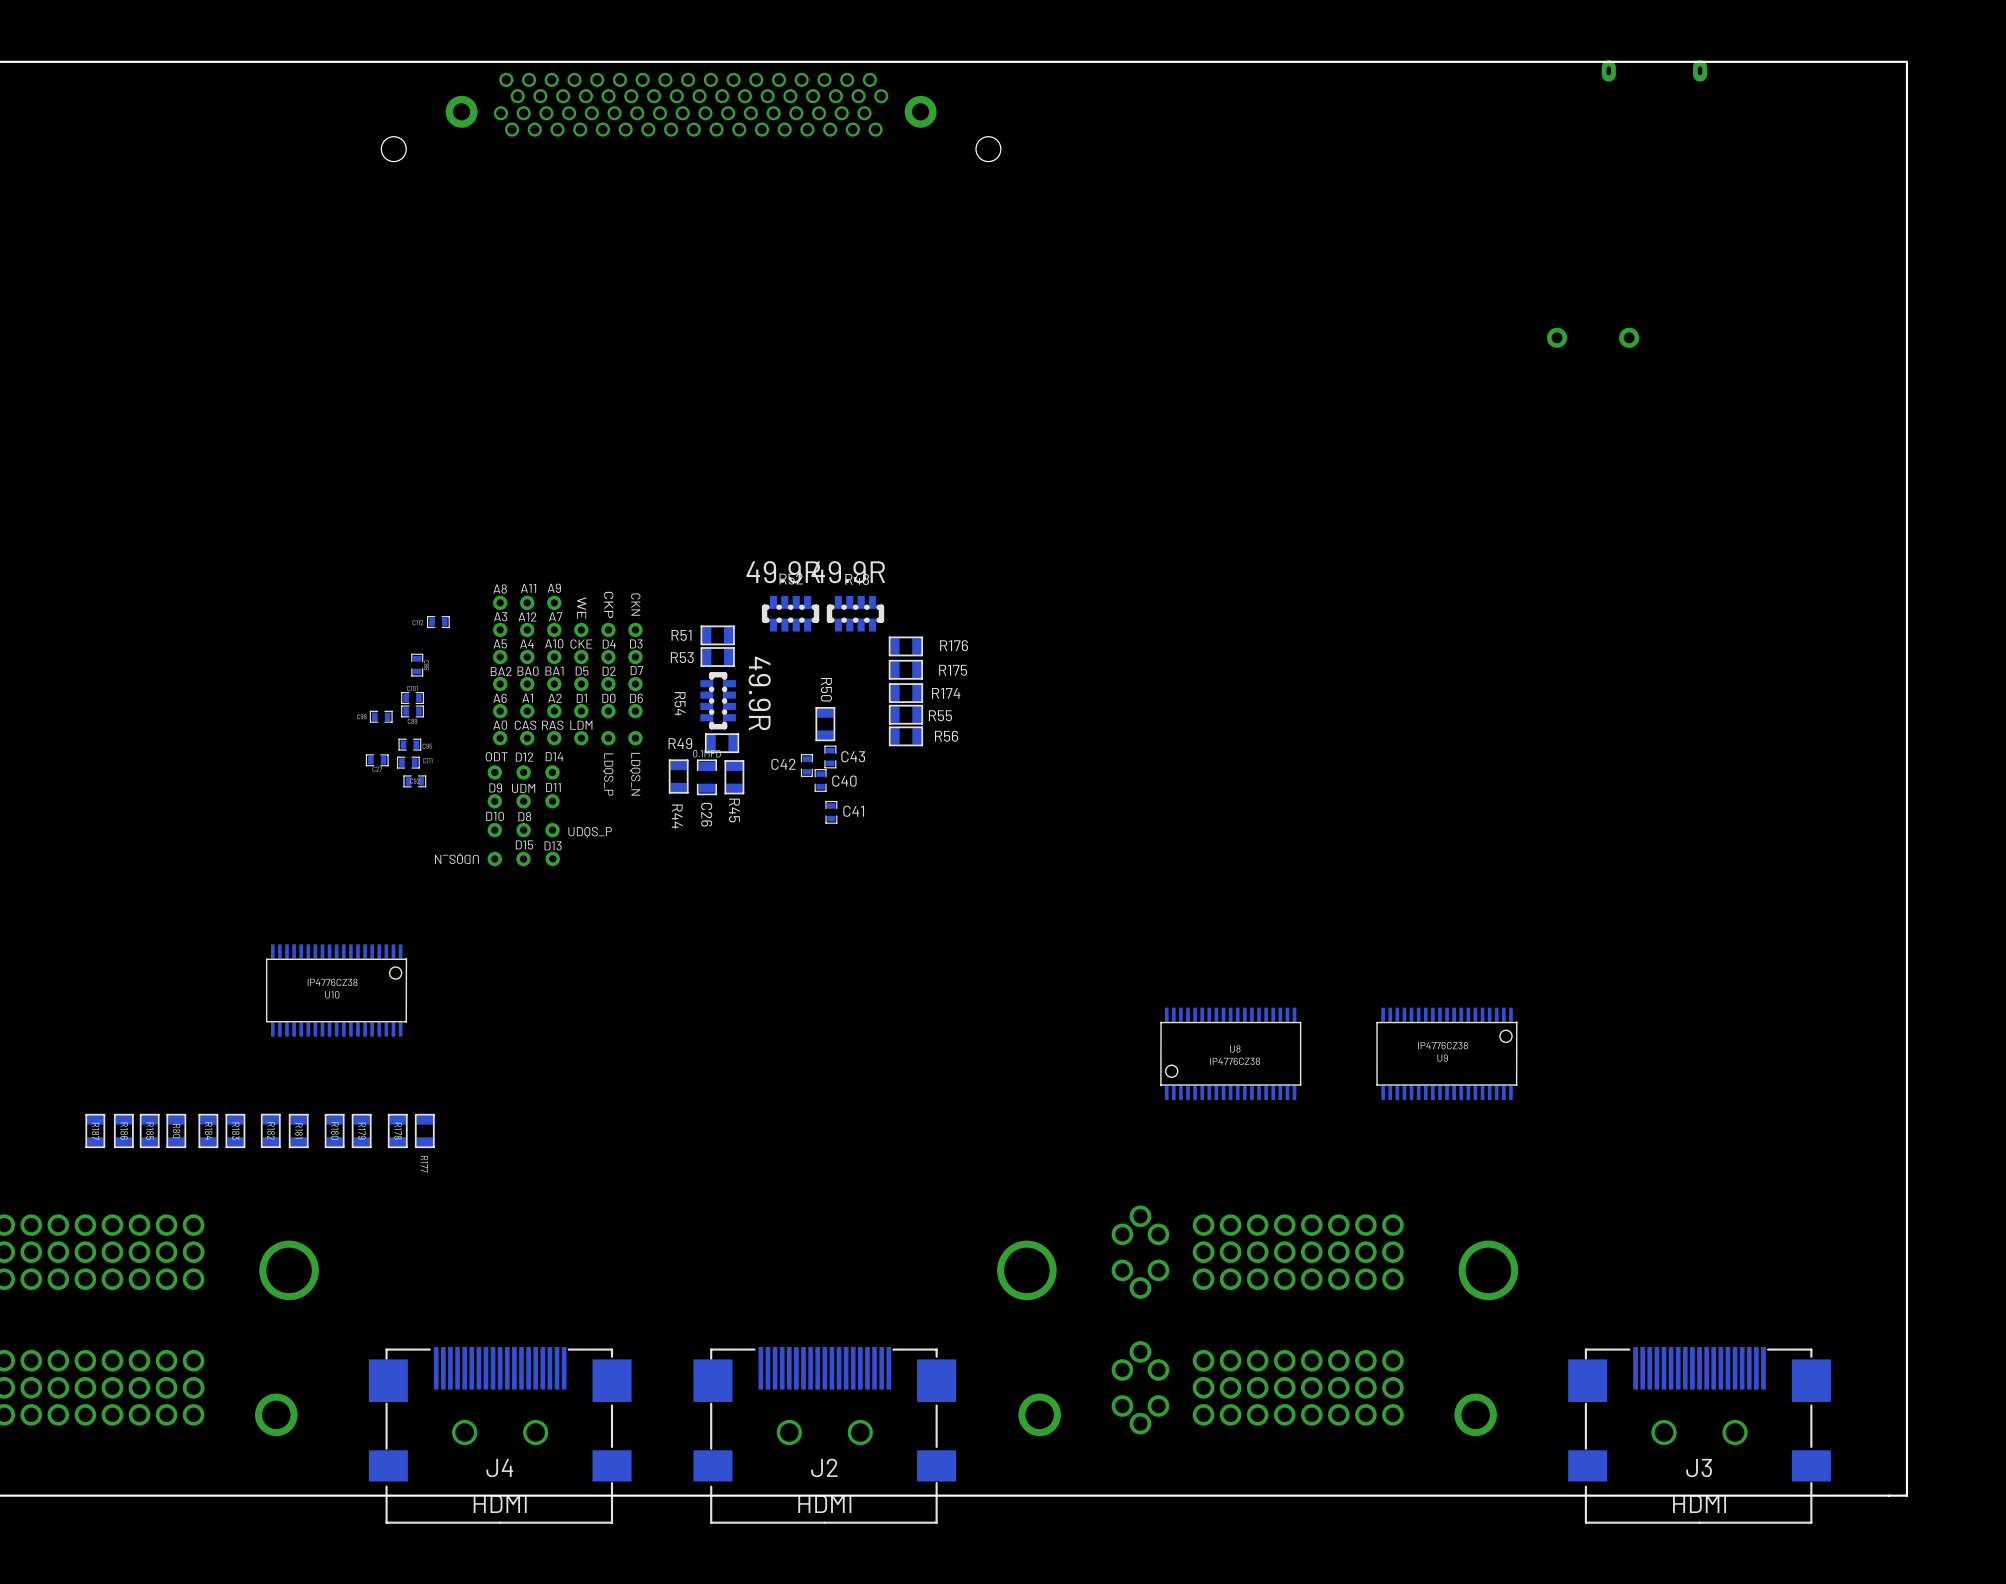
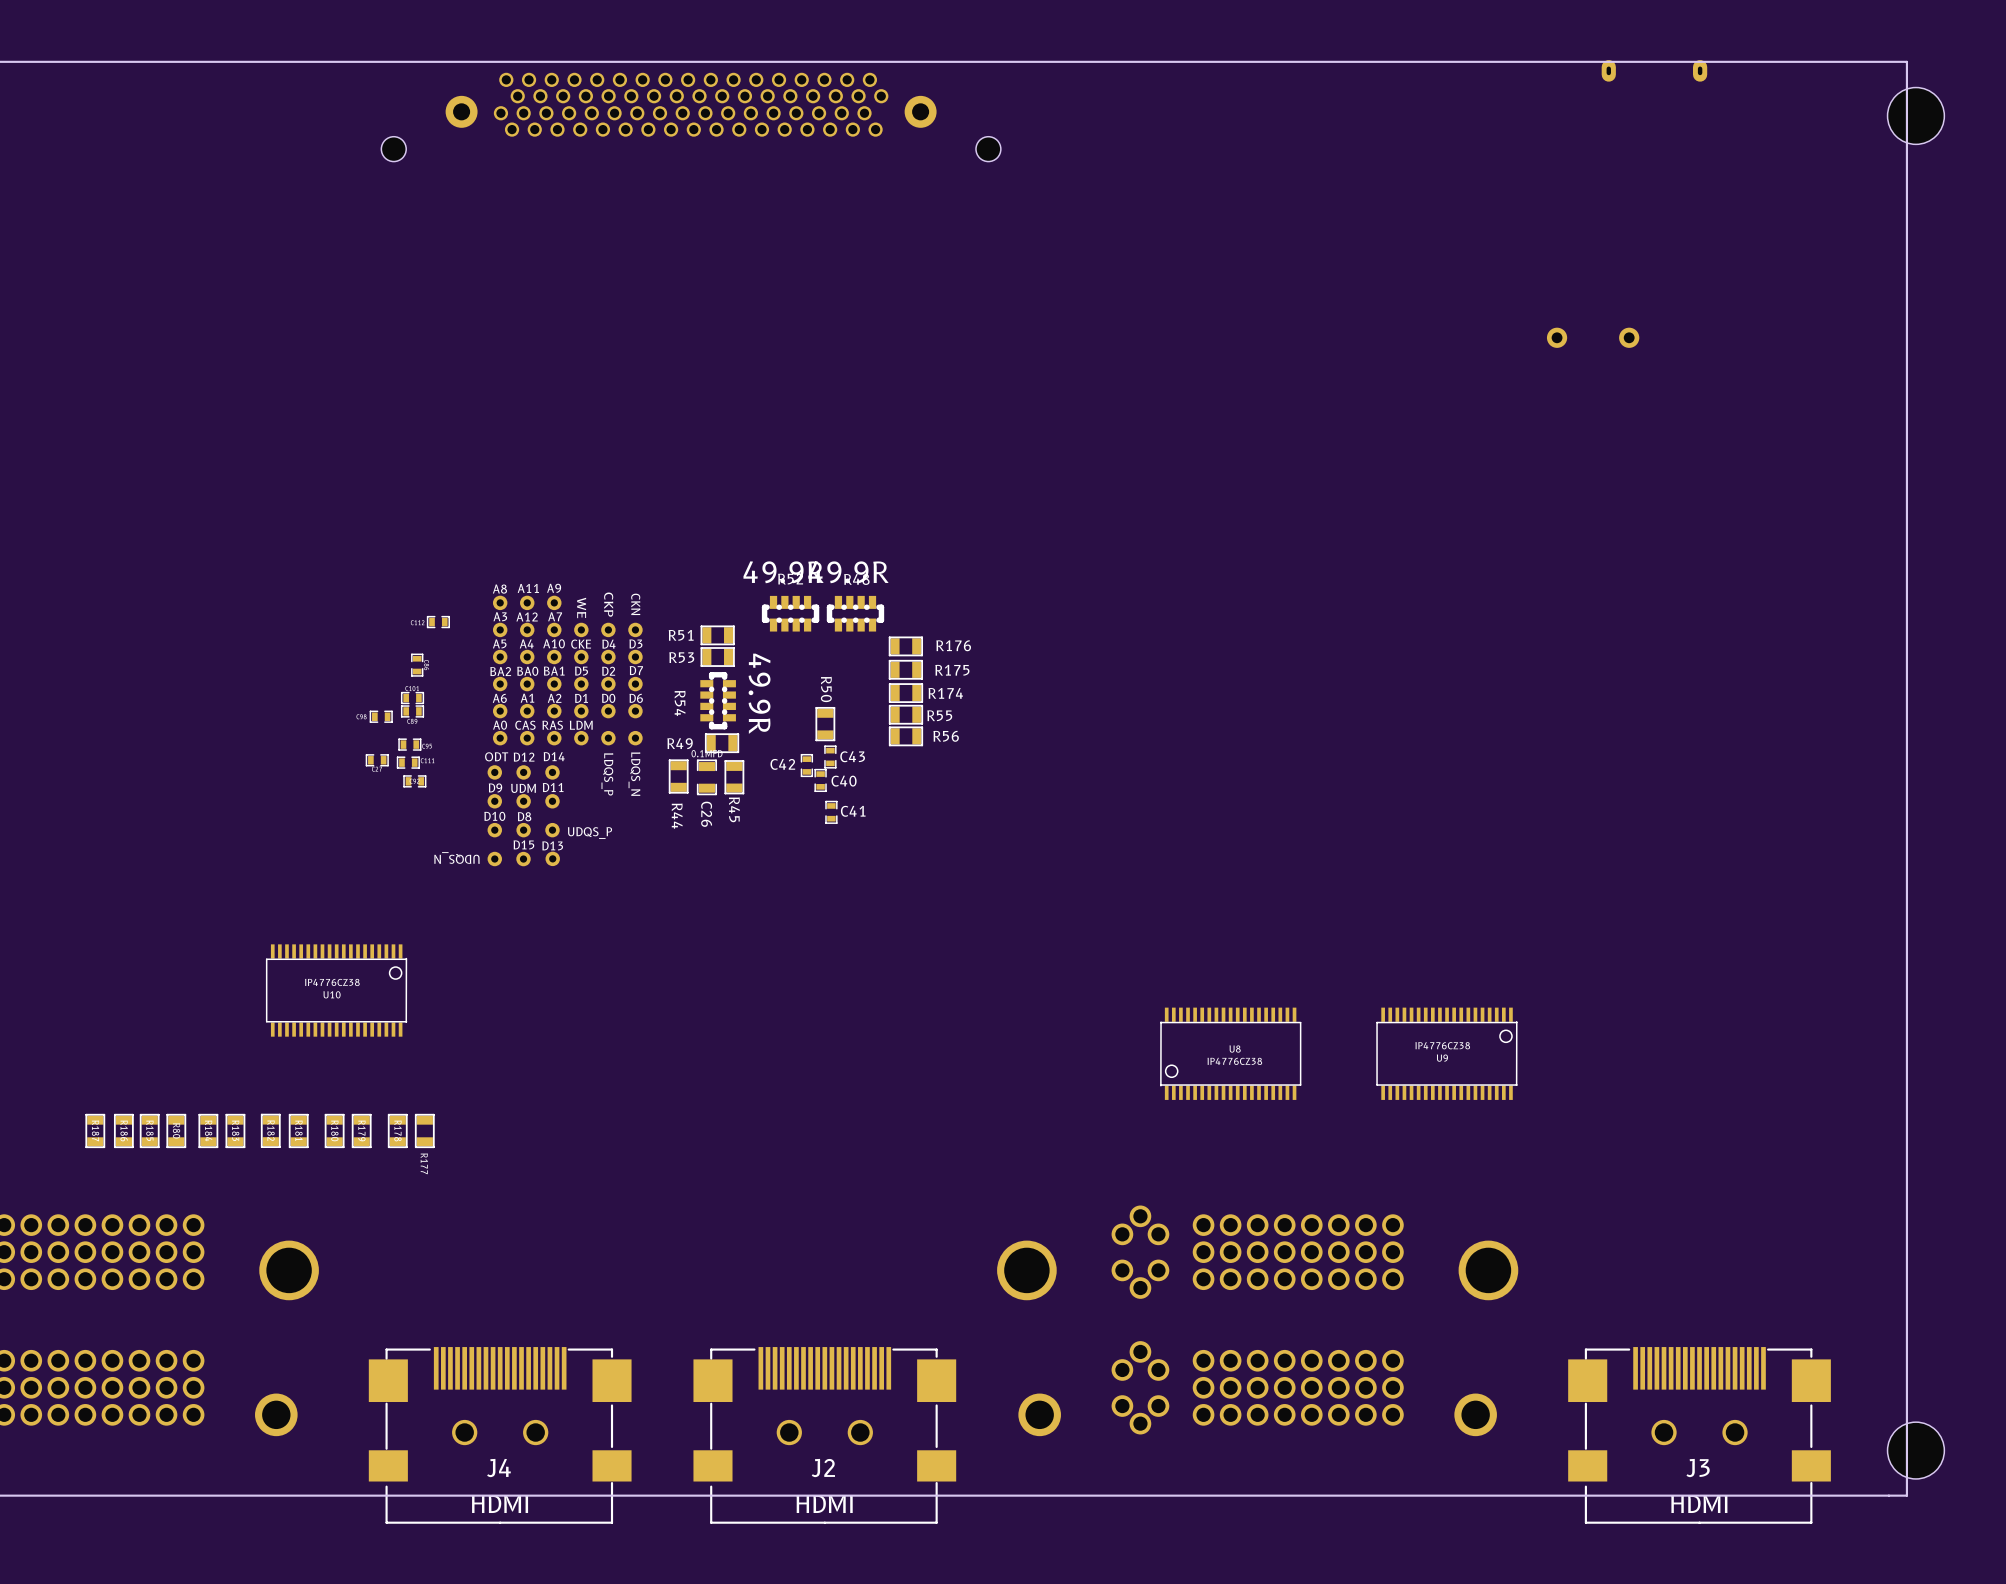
part: none -> (1915, 115)
part: none -> (1915, 1450)

